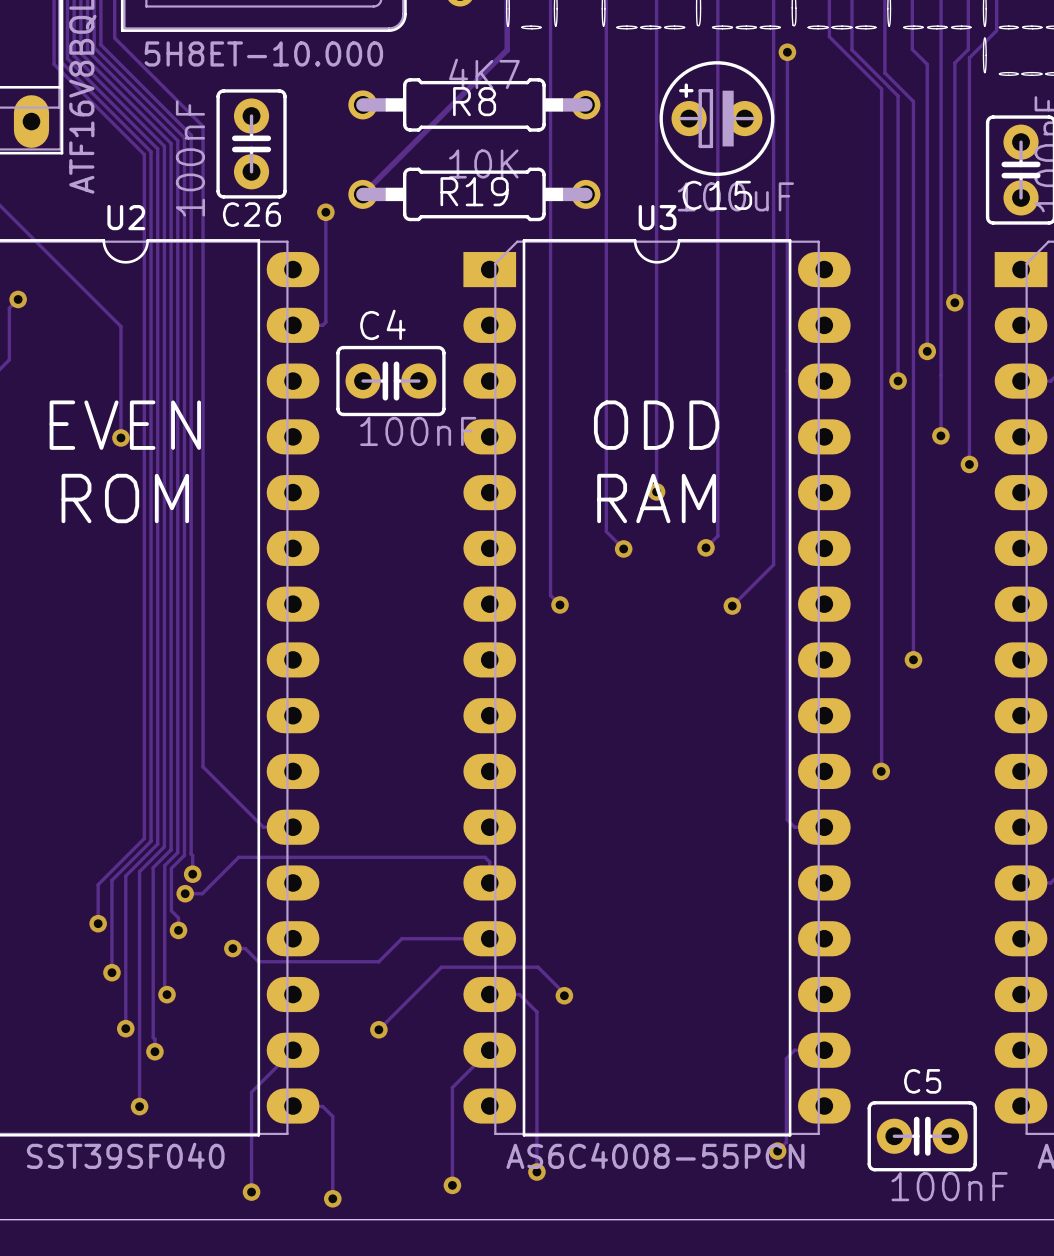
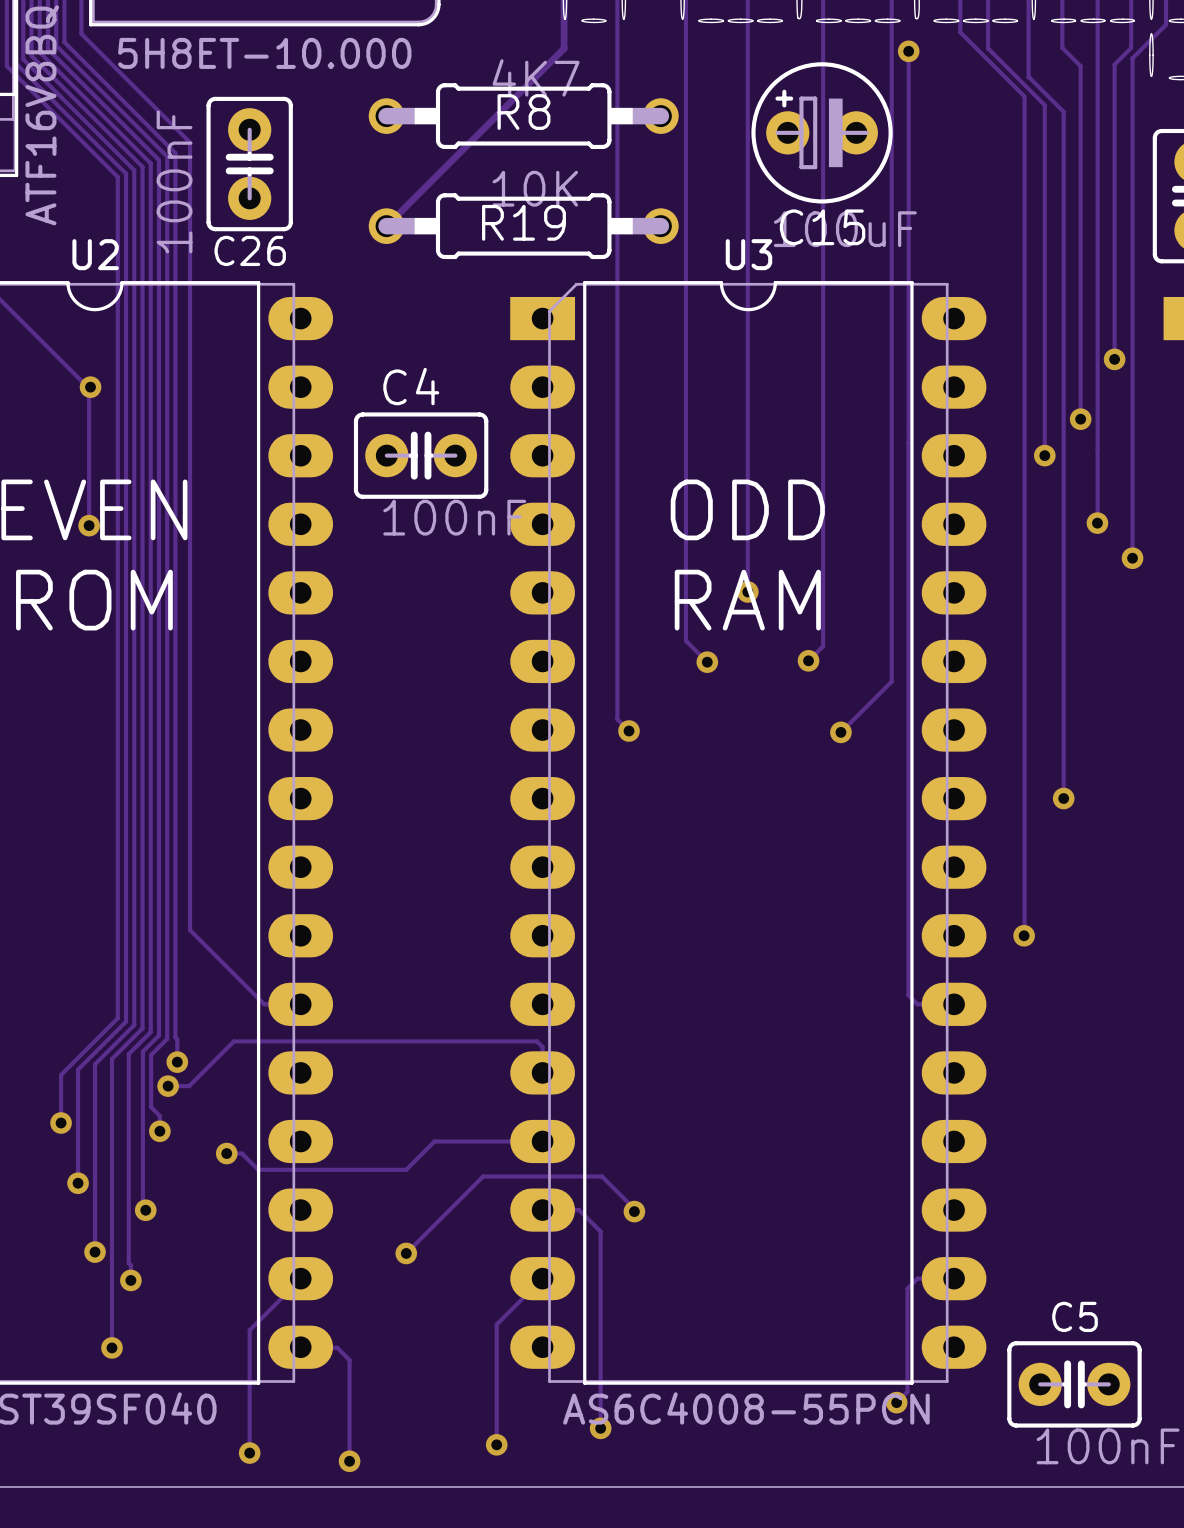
track: (325, 212) (325, 322) (322, 325) (293, 325) -> none
via: (325, 212) -> none
via: none -> (90, 387)

